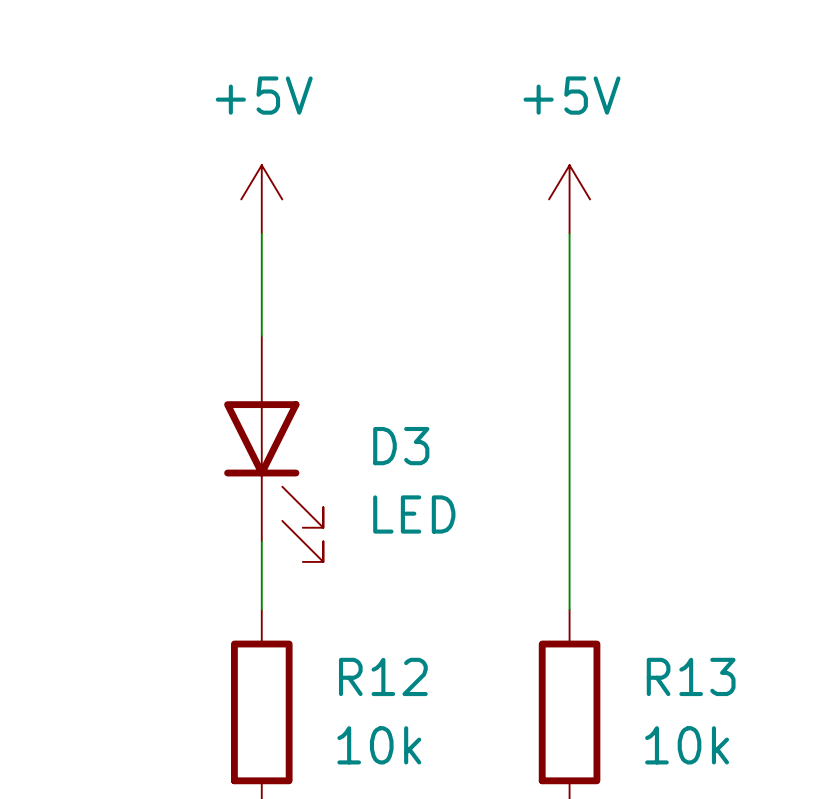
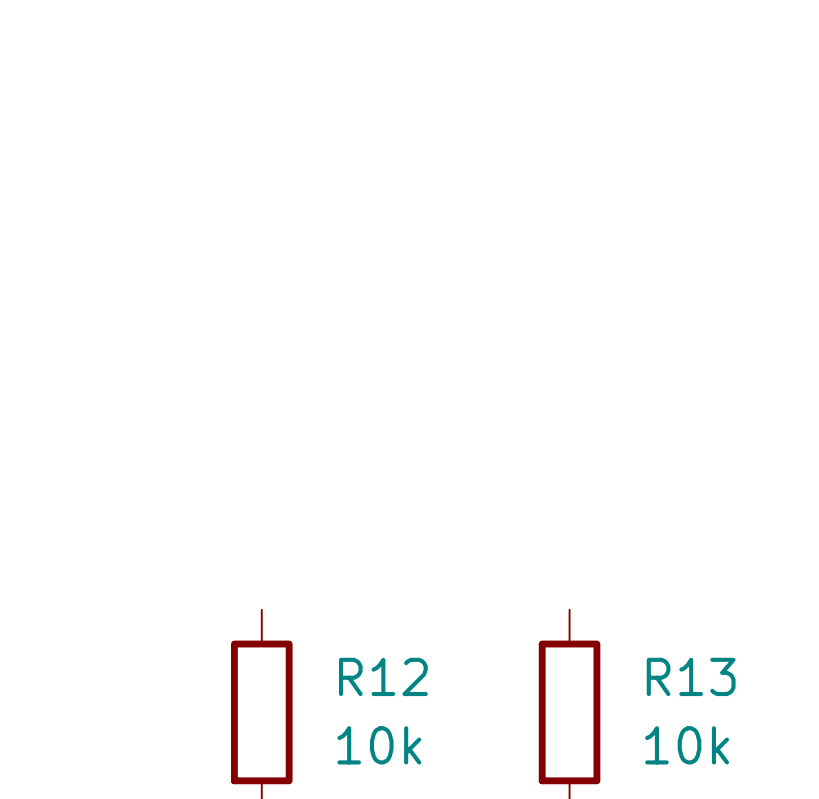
power symbol: +5V (261, 199) -> none
power symbol: +5V (569, 199) -> none
wire: (261, 233) (261, 336) -> none
wire: (569, 233) (569, 609) -> none
D3: LED (273, 449) -> none
wire: (261, 541) (261, 609) -> none

